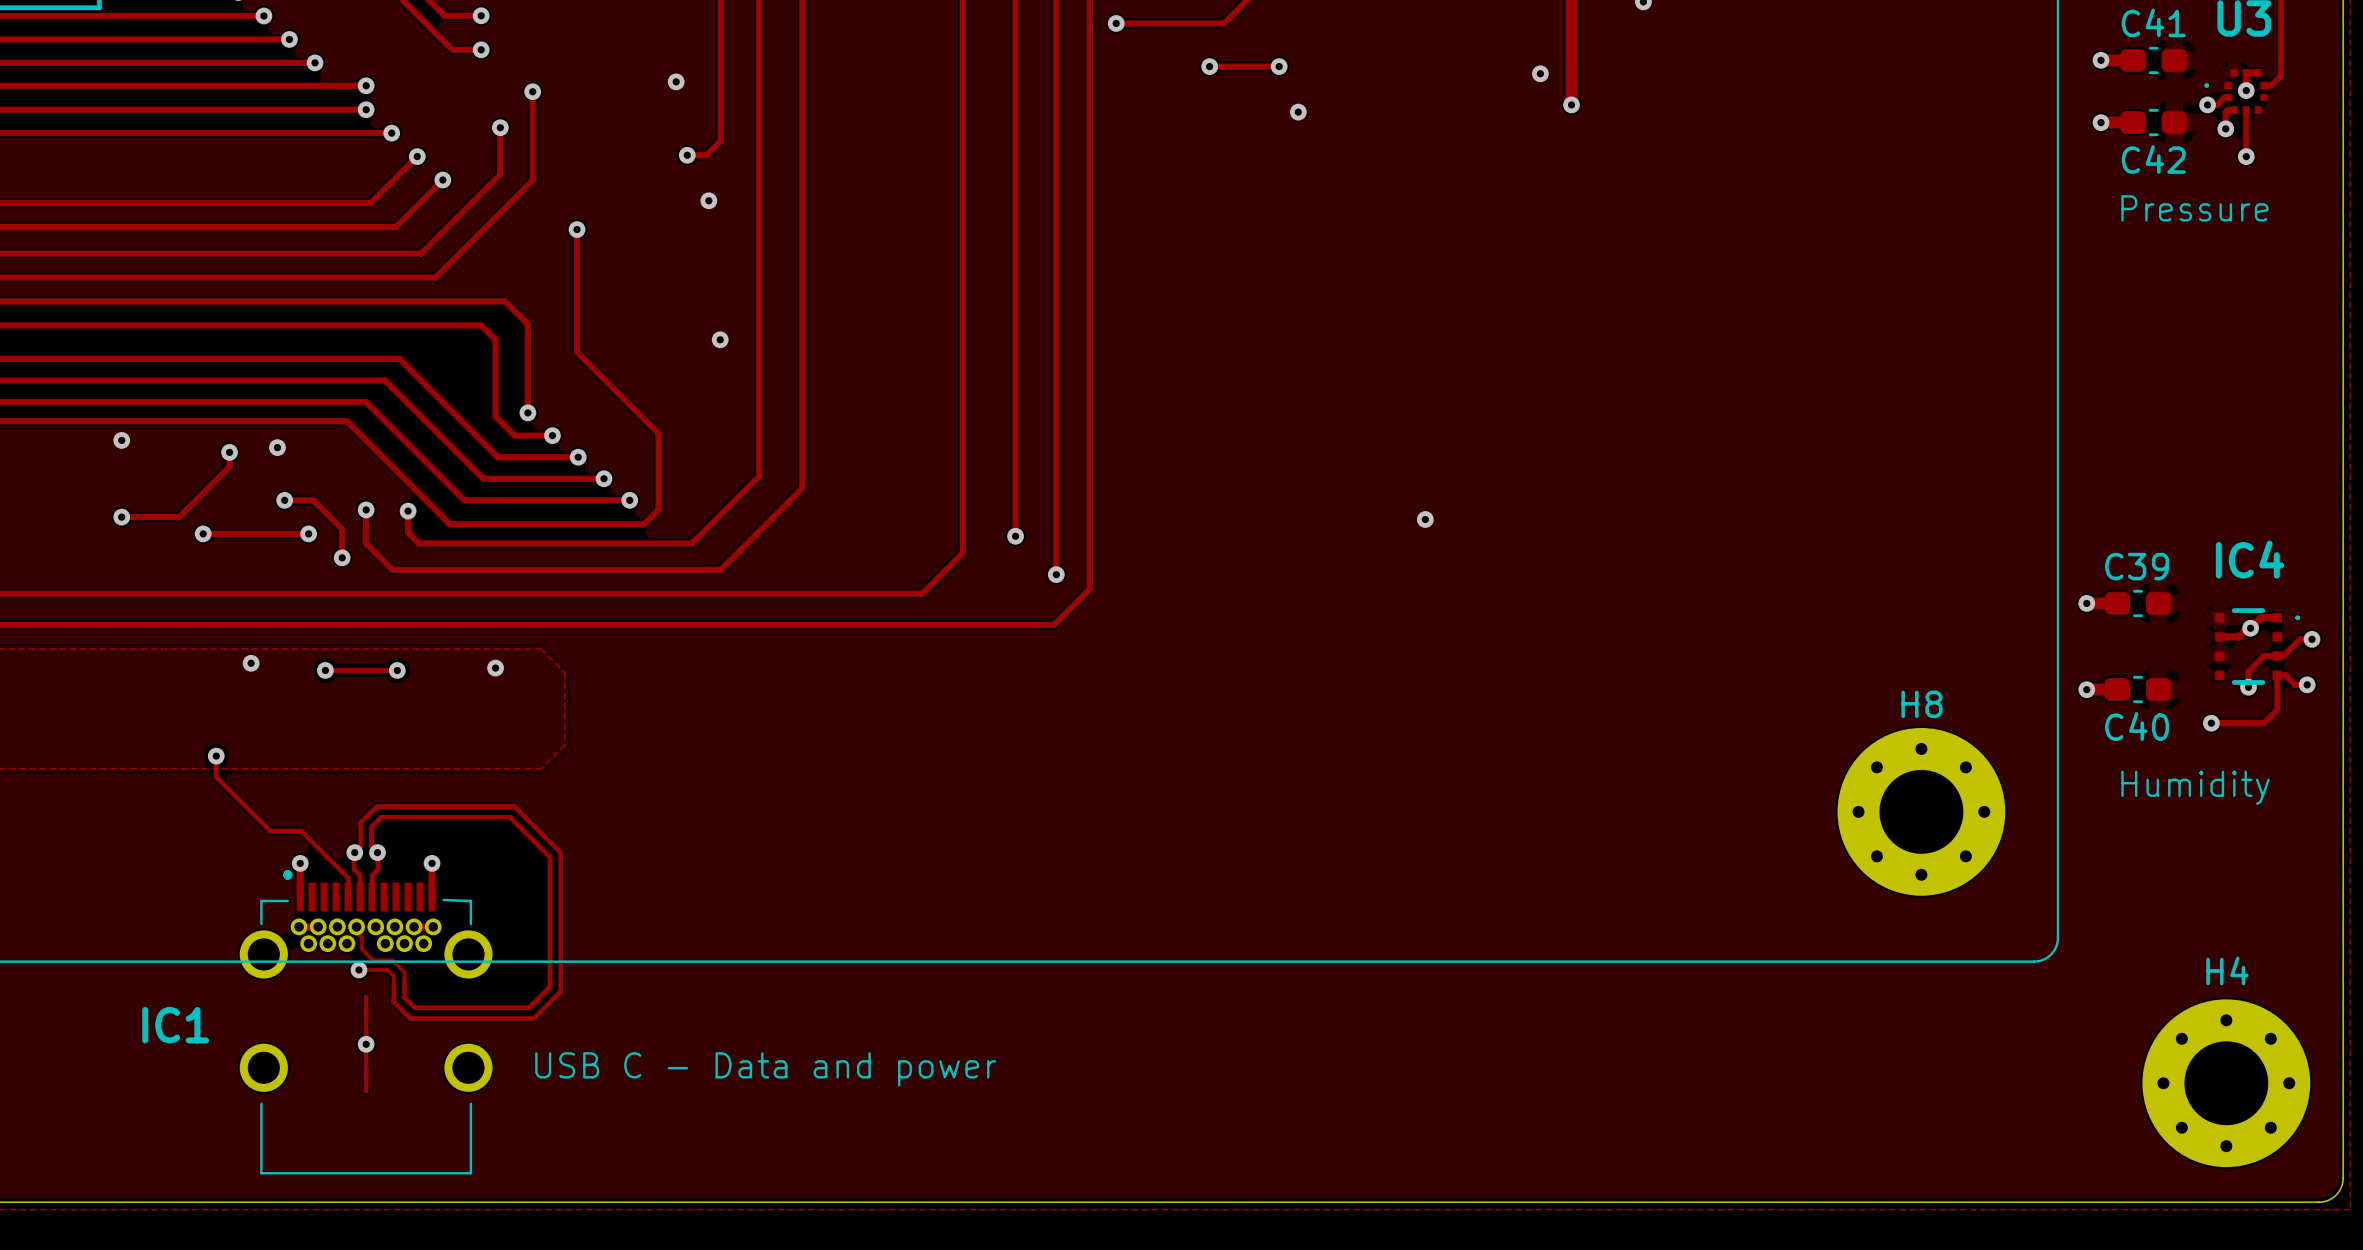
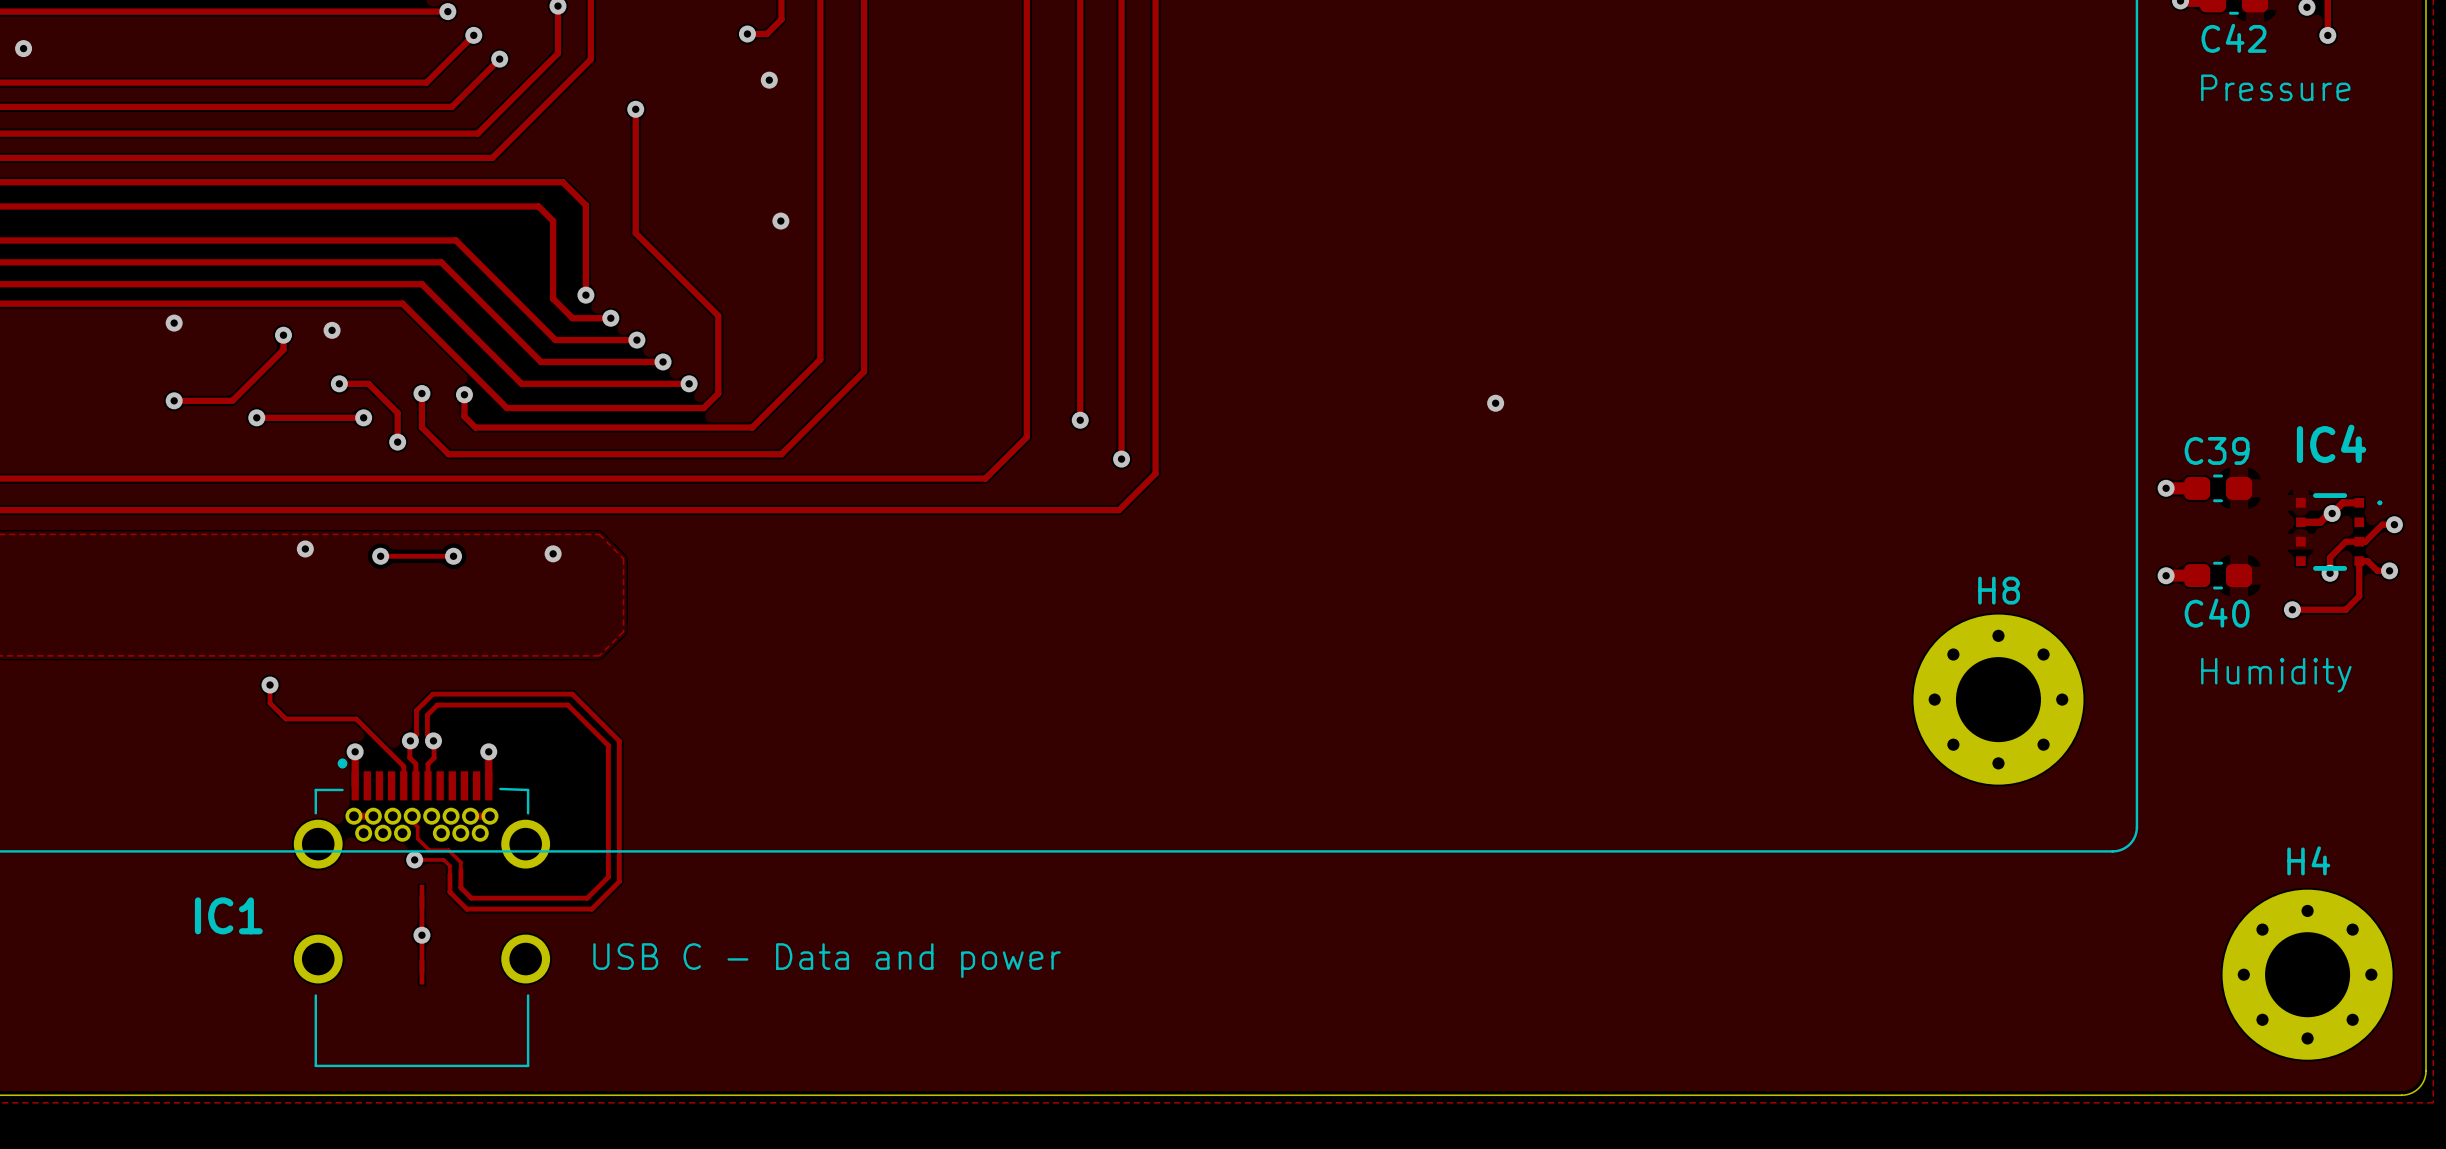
track: (216, 756) (216, 777) (270, 831) -> (270, 685) (270, 703) (285, 719) (324, 719)
via position: (216, 756) -> (270, 685)

